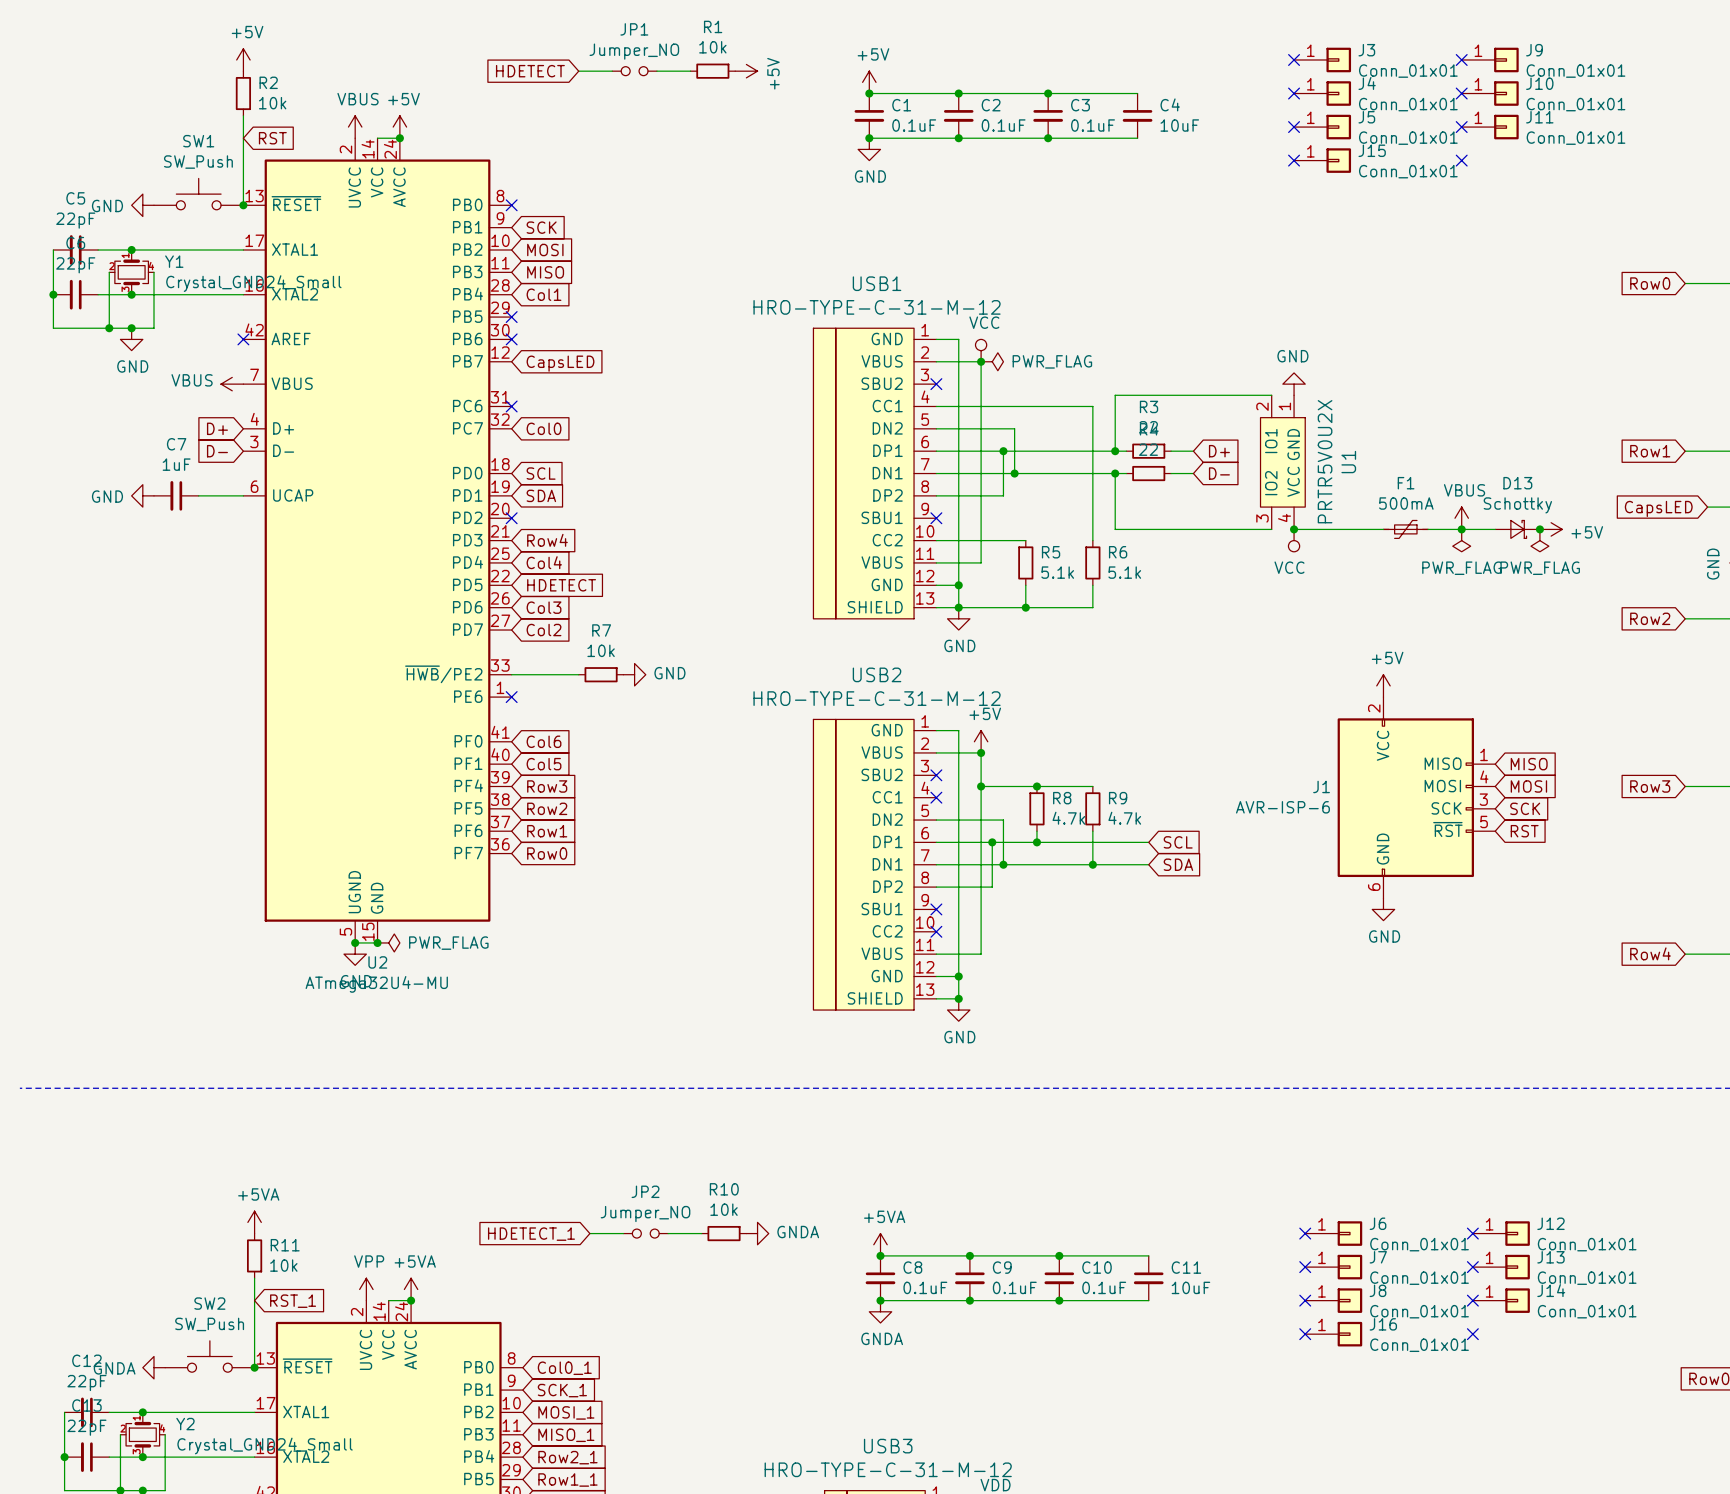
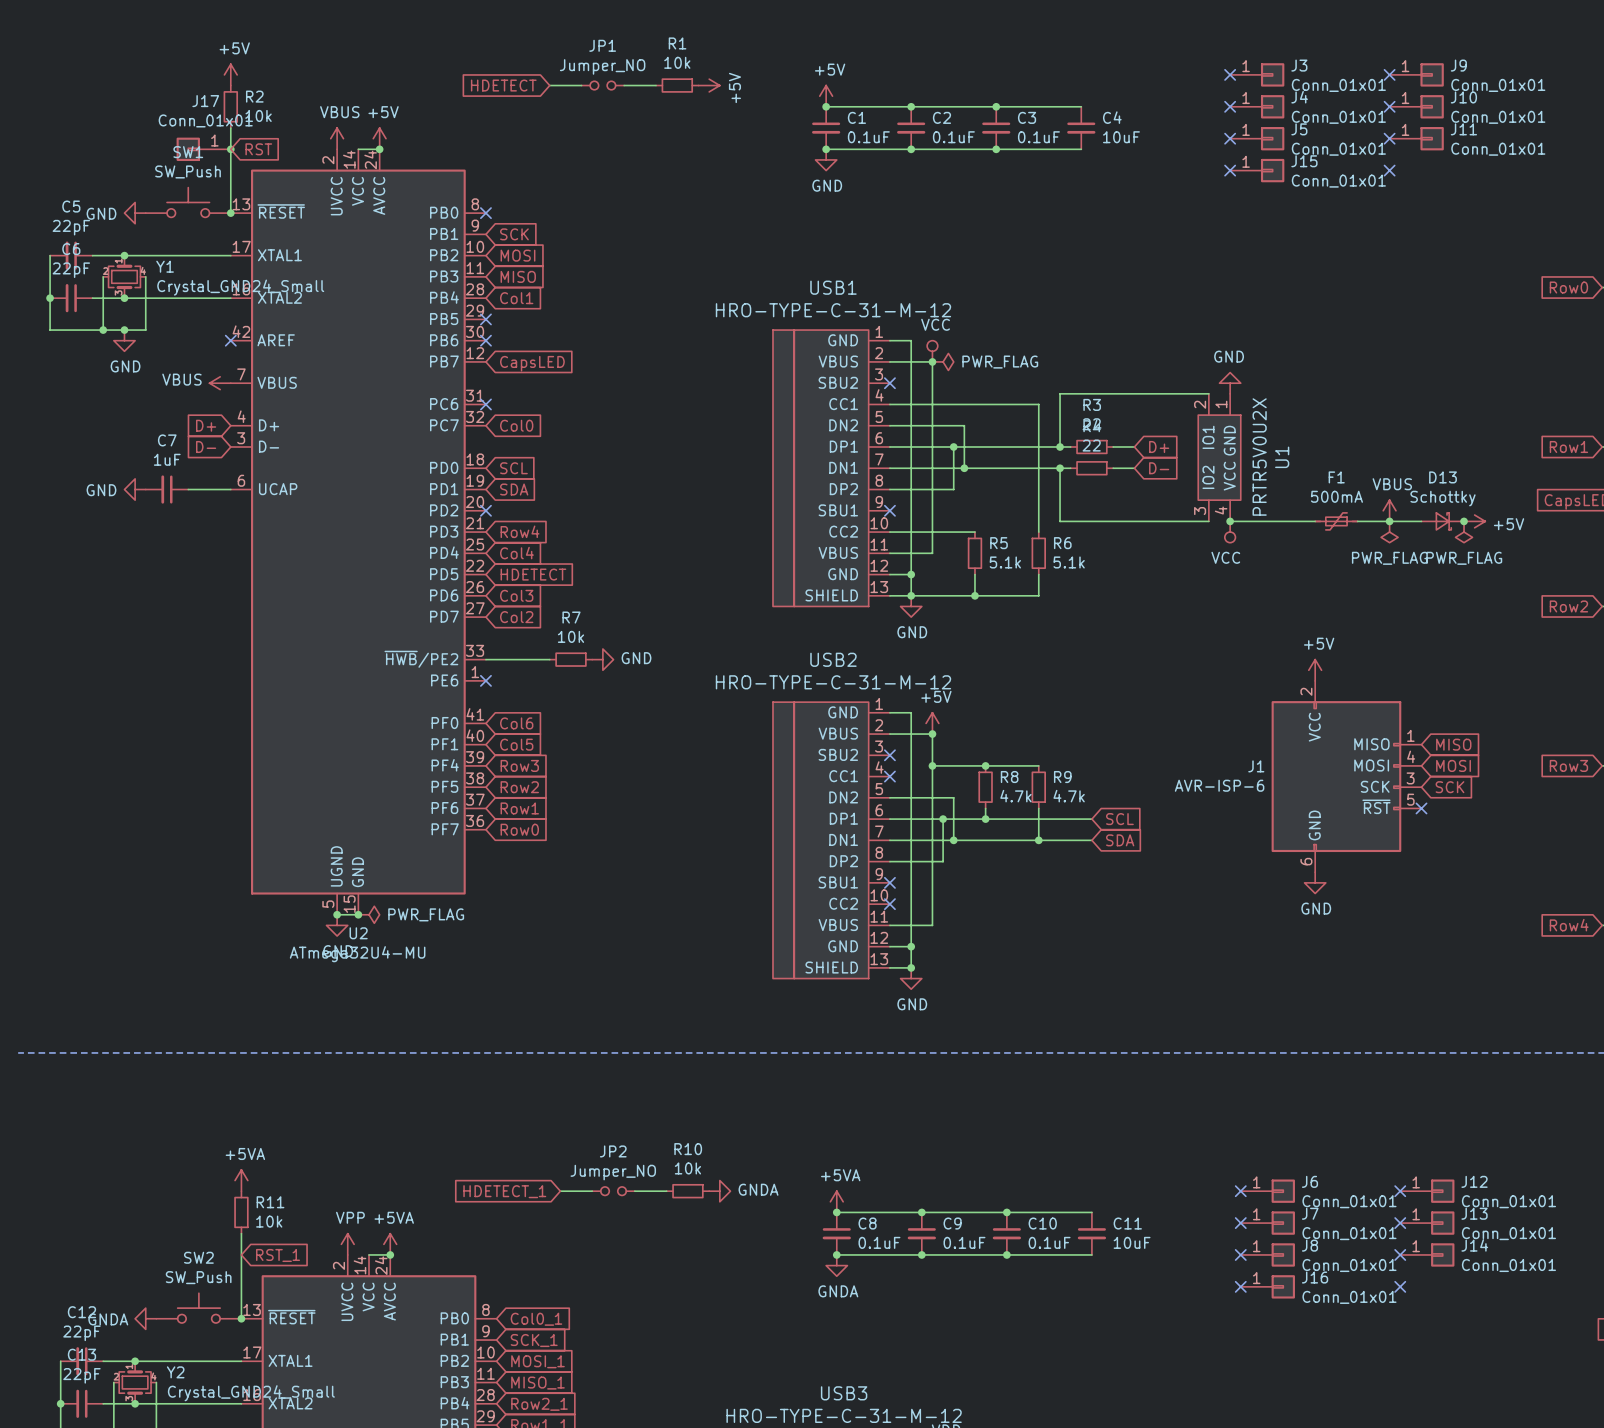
J17: none -> Conn_01x01 (203, 149)
junction: none -> (230, 149)
no-connect mark: none -> (1421, 808)
global label: RST (1524, 831) -> none

